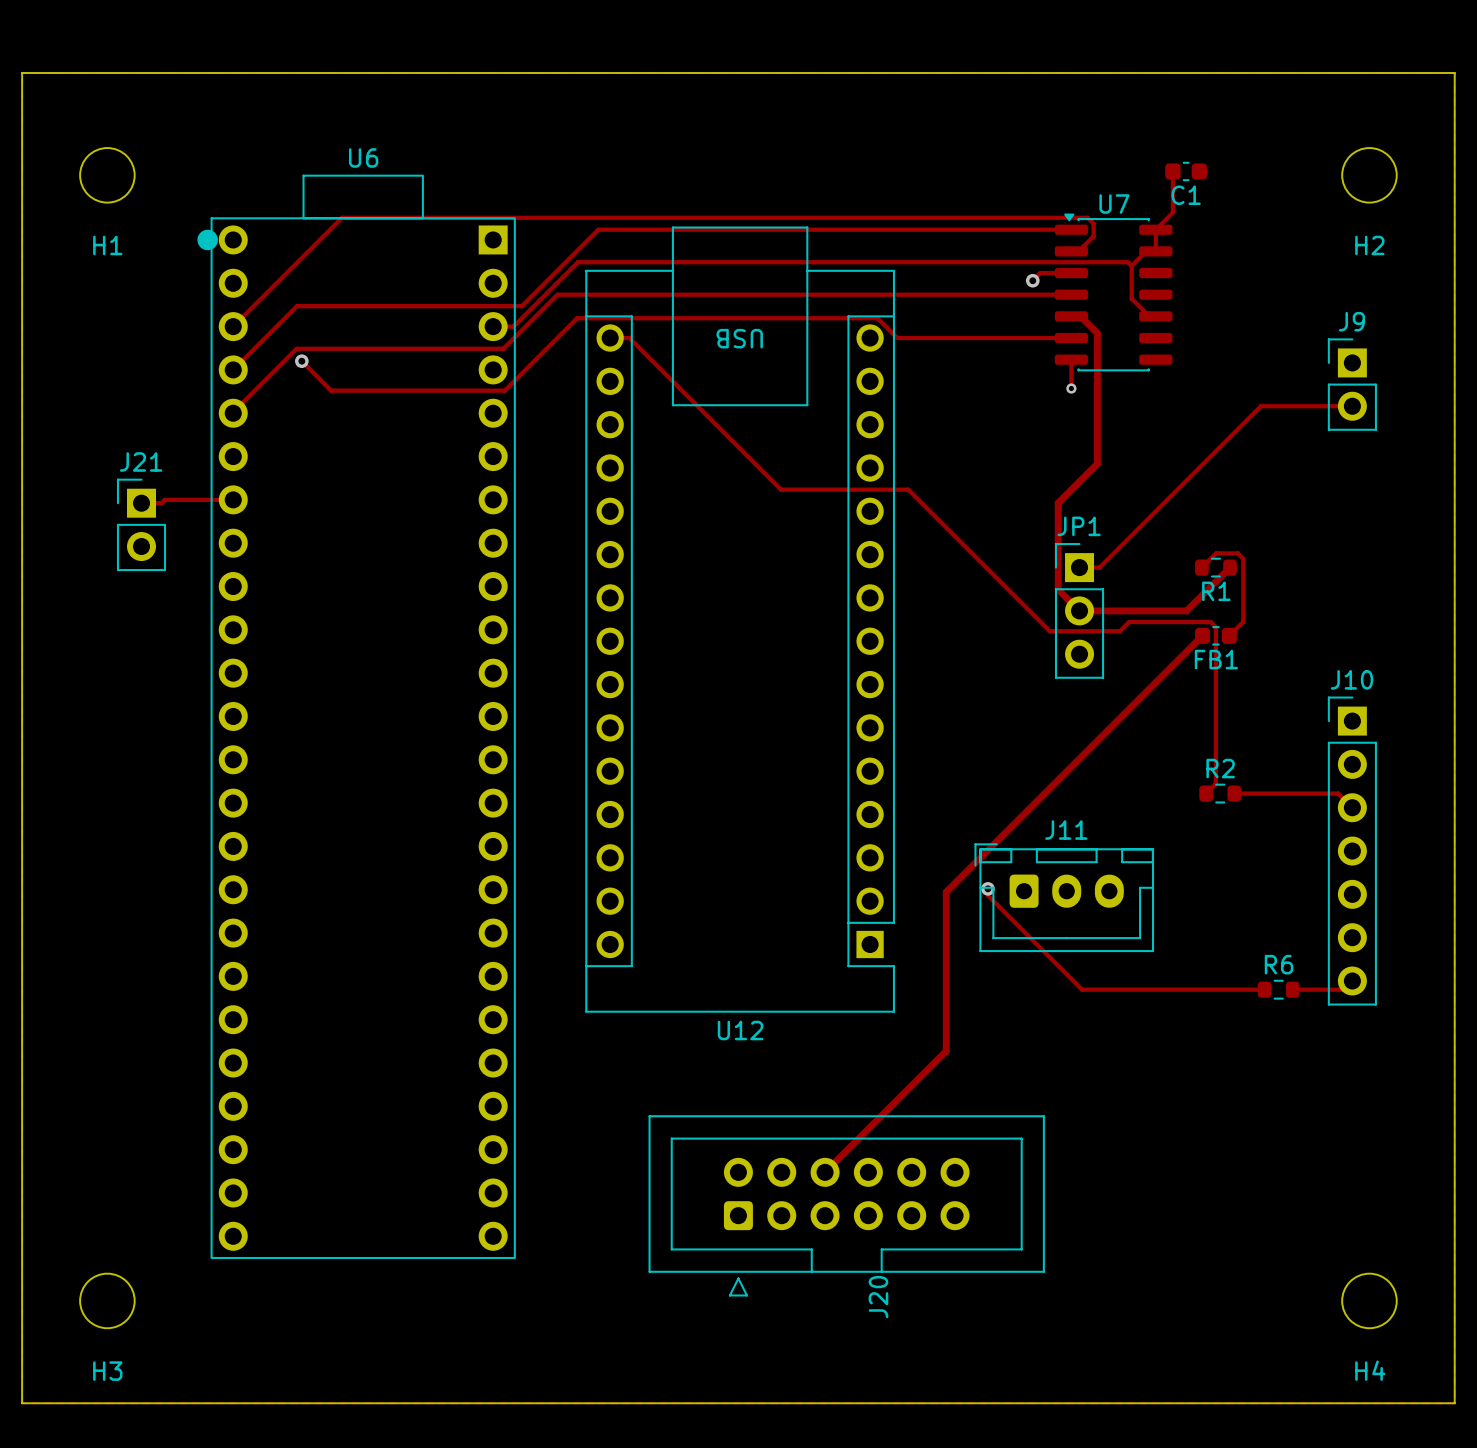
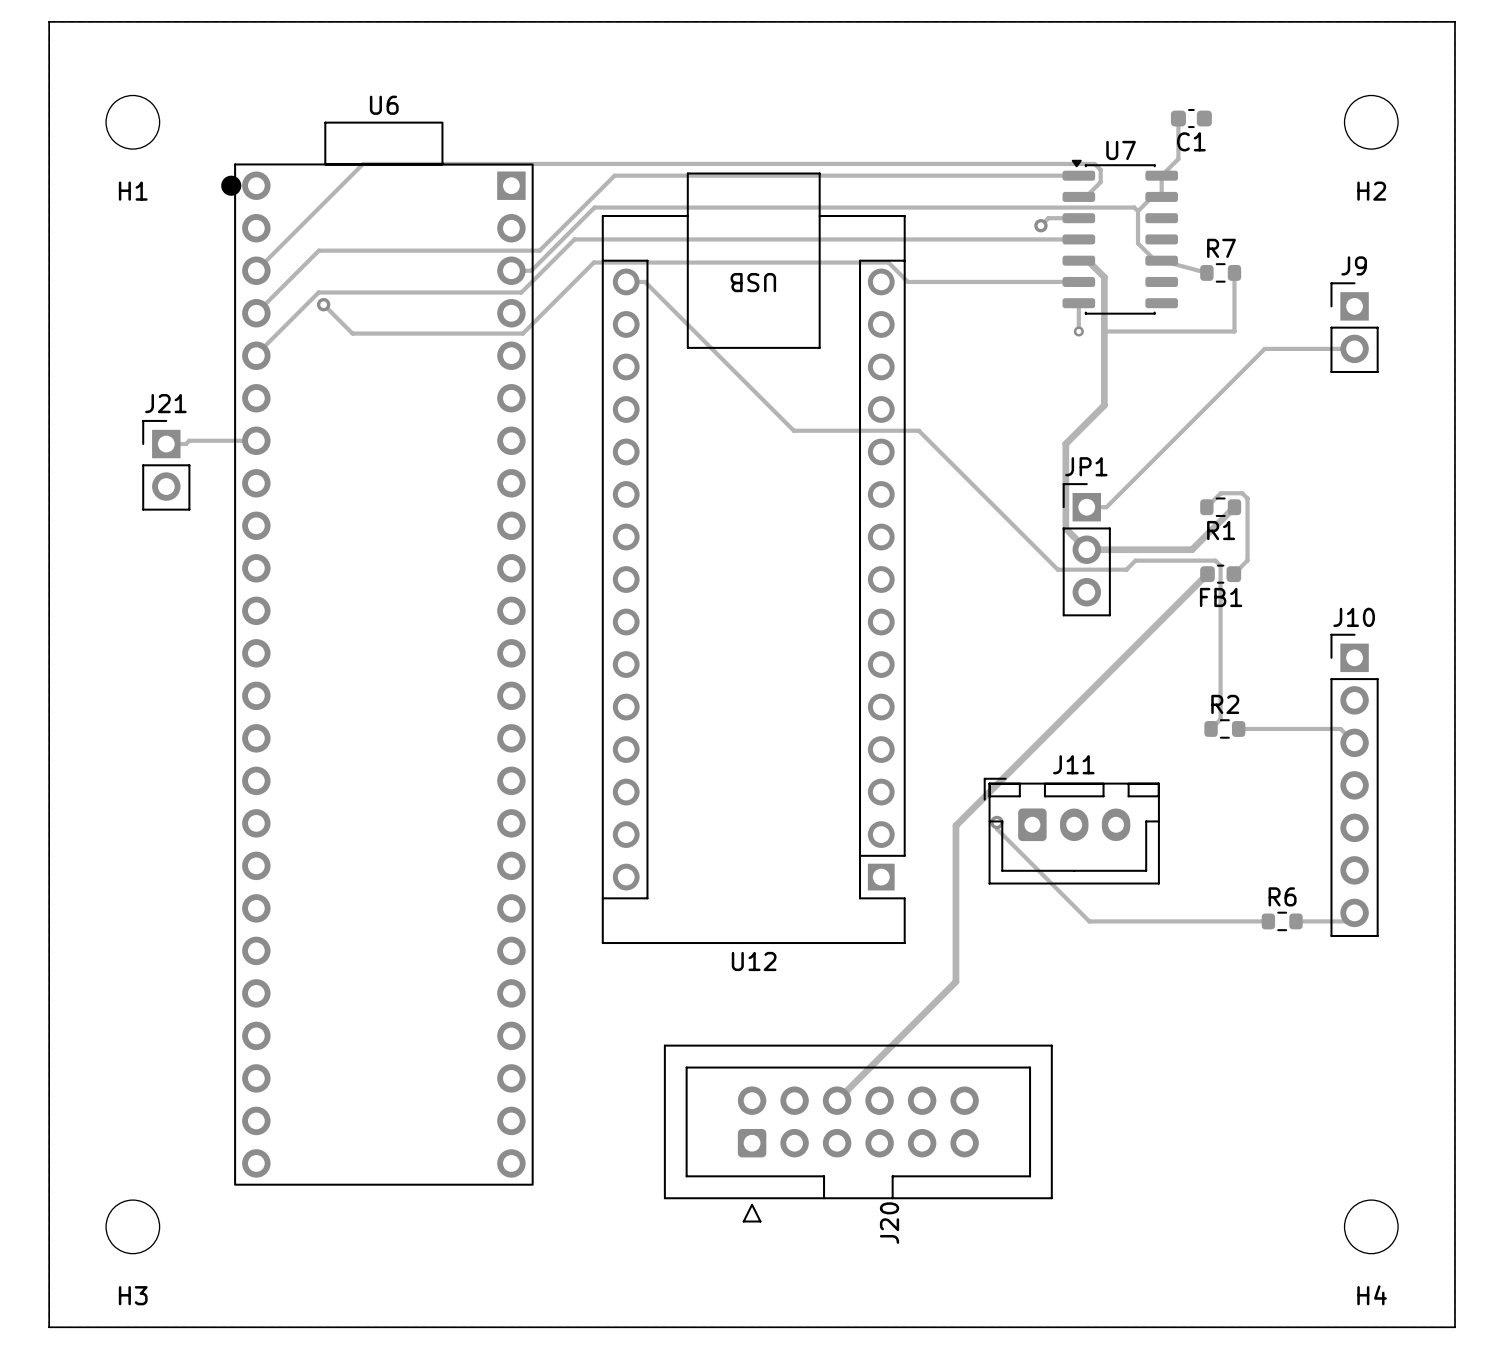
track: none -> (1161, 260) (1206, 272)
R7: none -> (1220, 272)
track: none -> (1234, 272) (1234, 331) (1104, 331)

